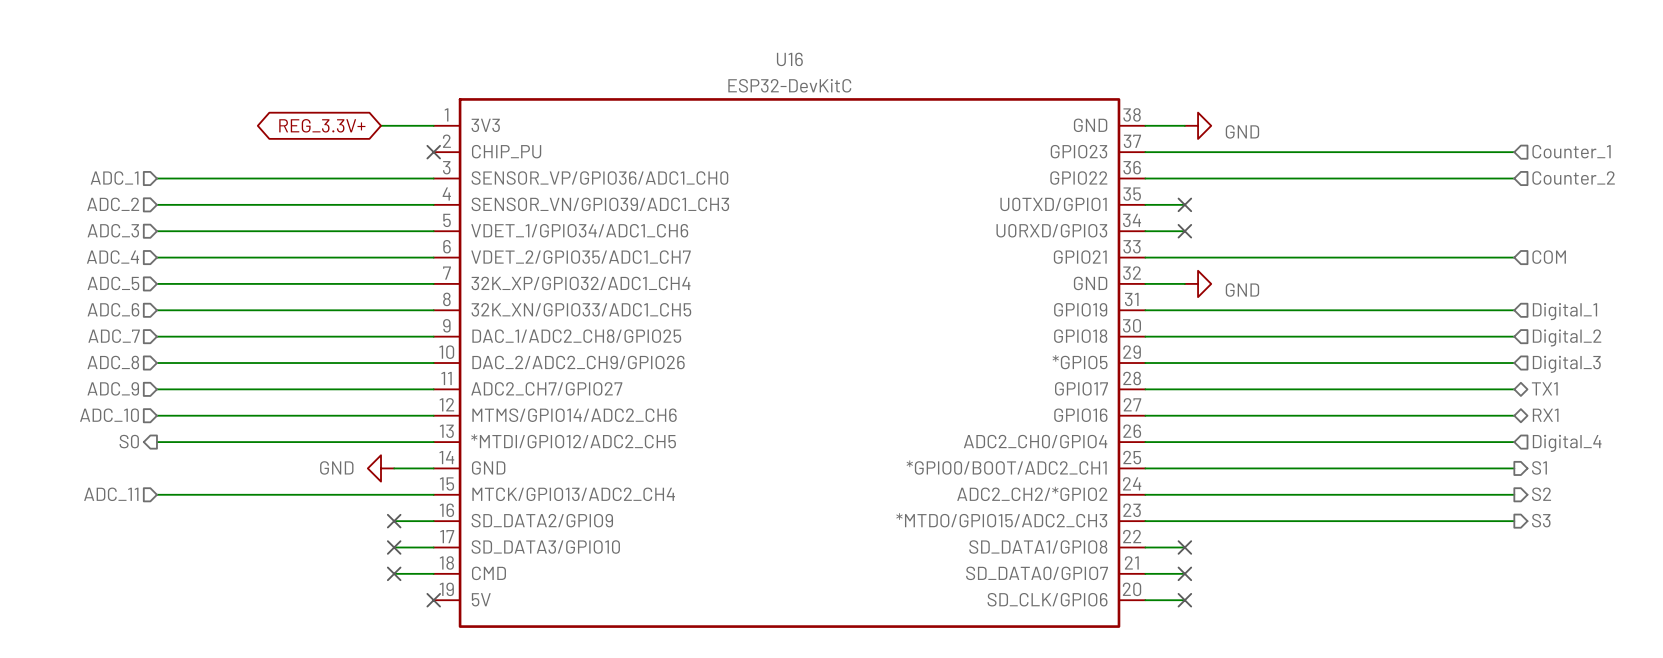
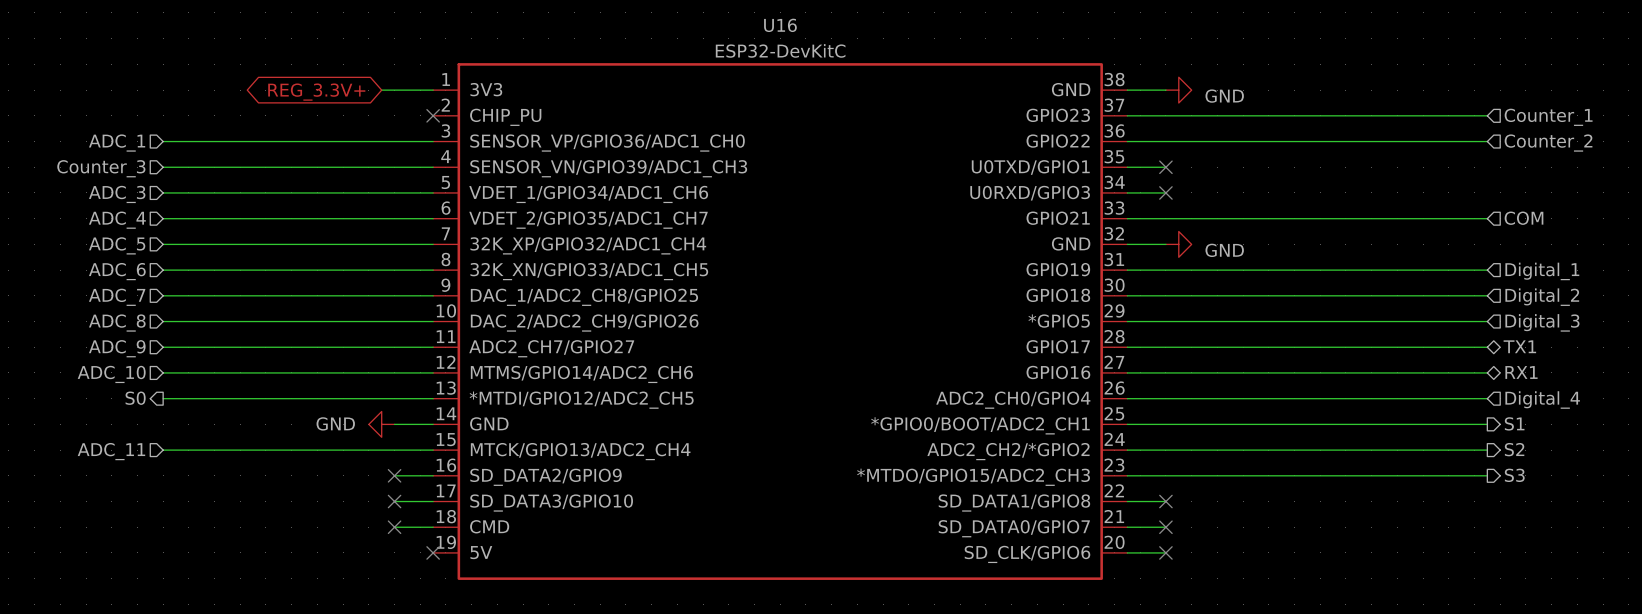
hierarchical label: ADC_2 (113, 204) -> Counter_3 (101, 168)

